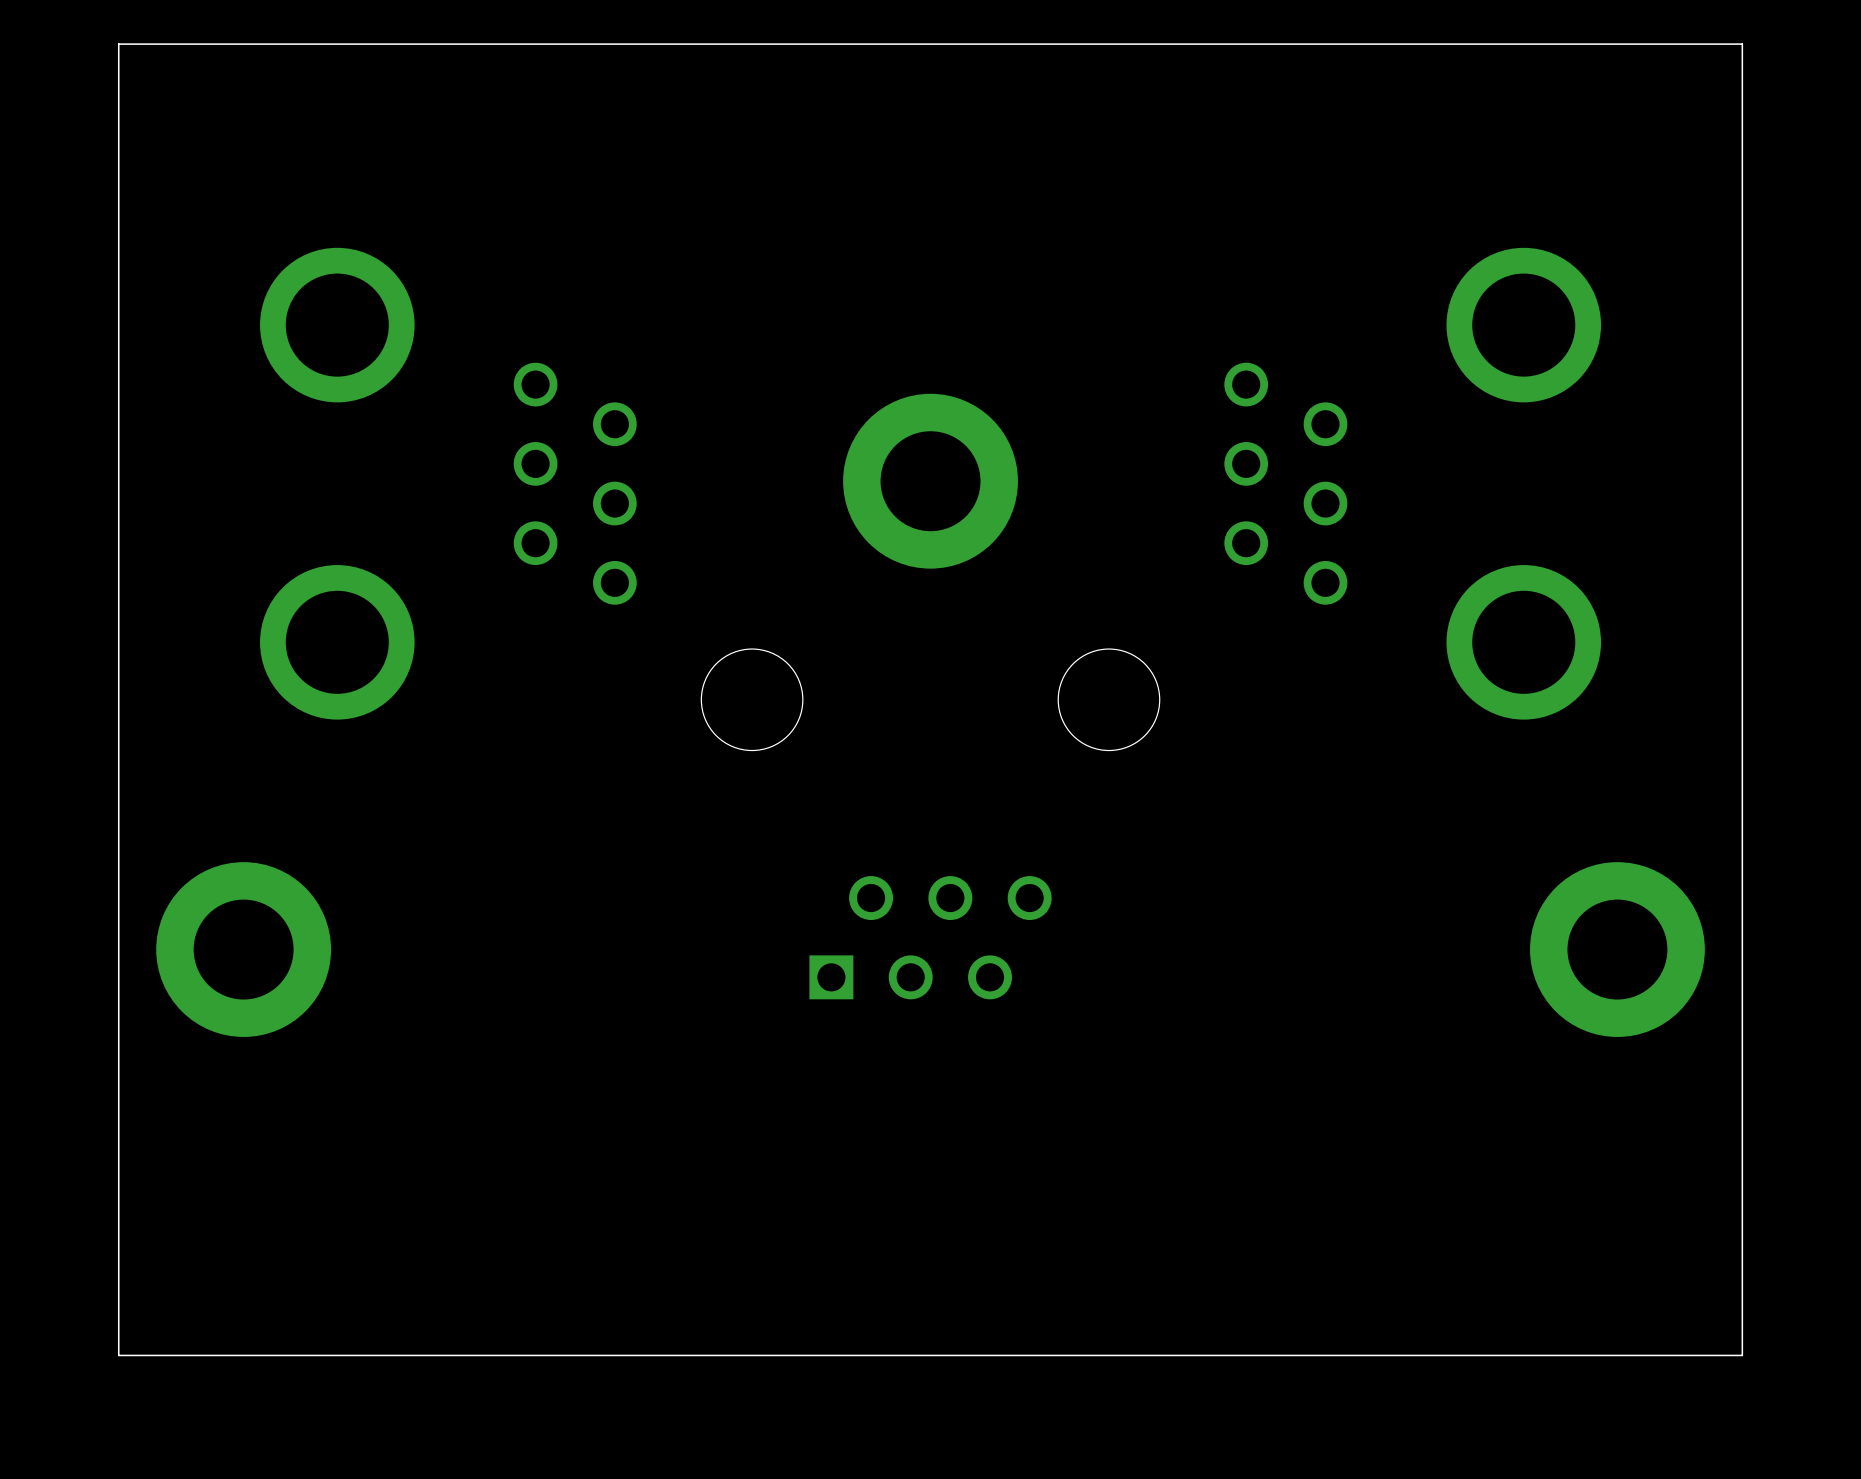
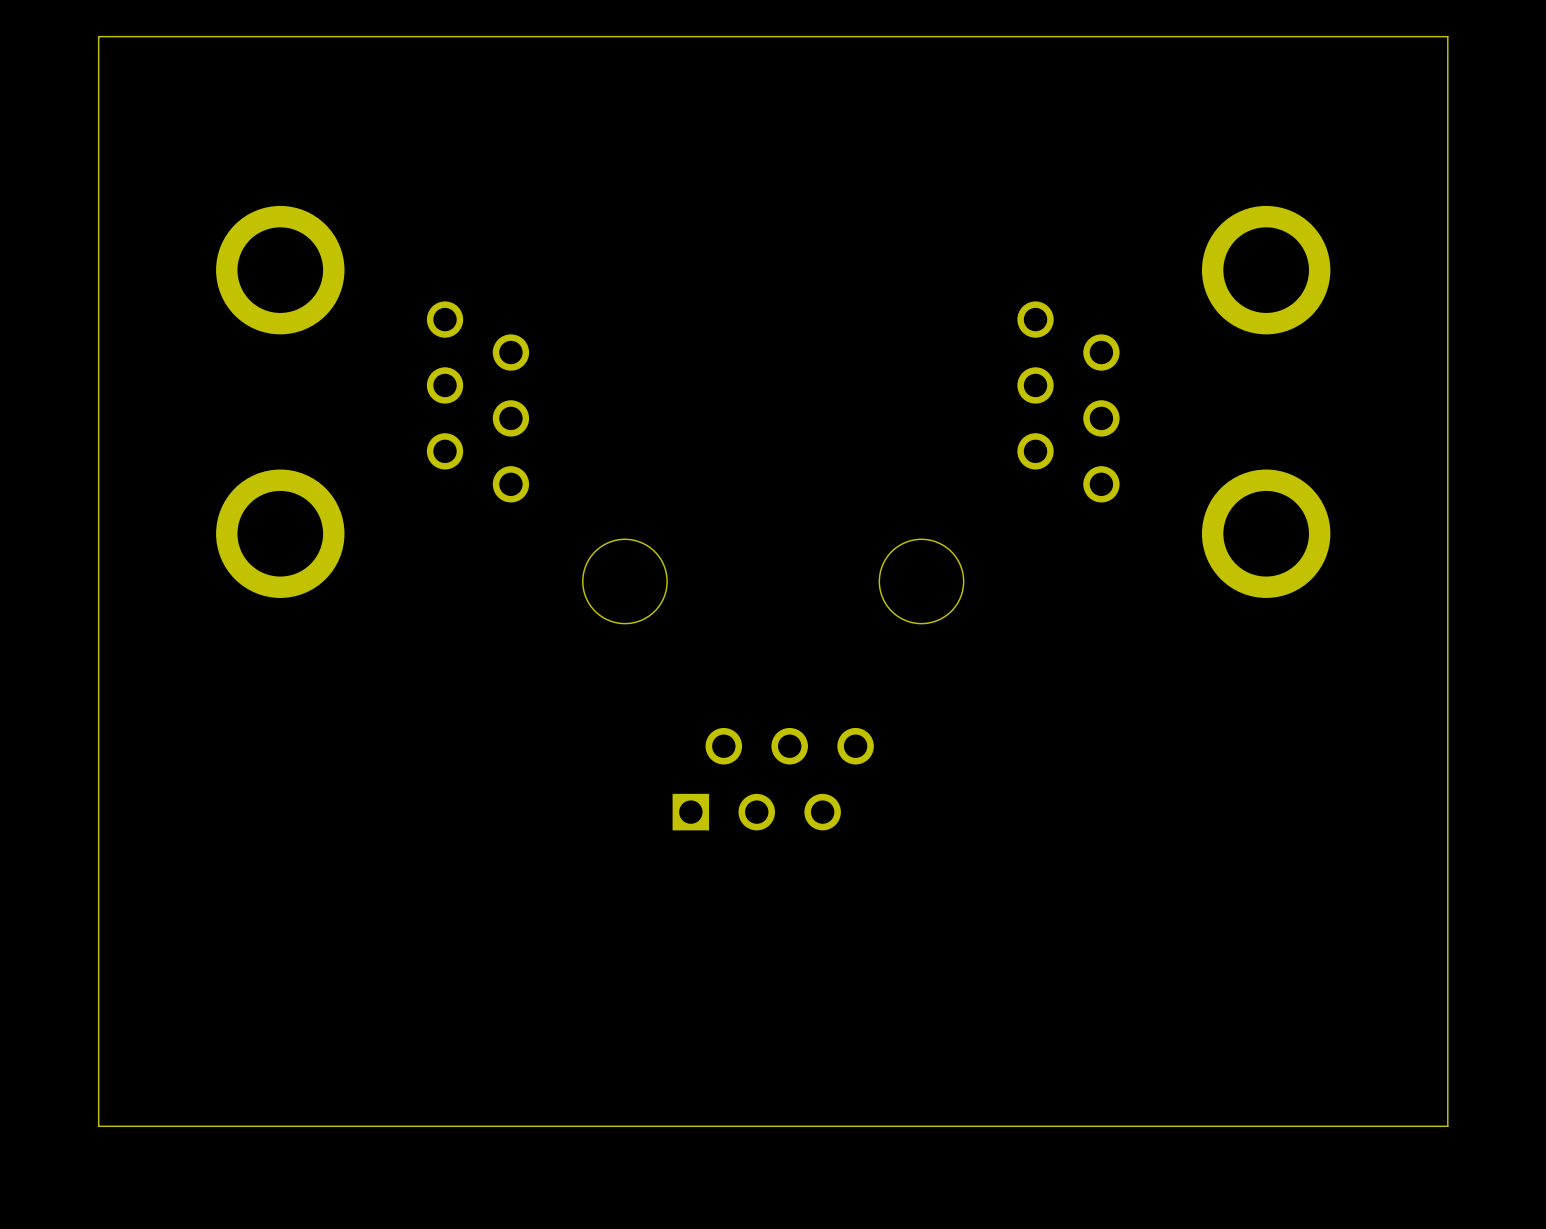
part: (930, 481) -> none
part: (243, 949) -> none
part: (1617, 949) -> none

